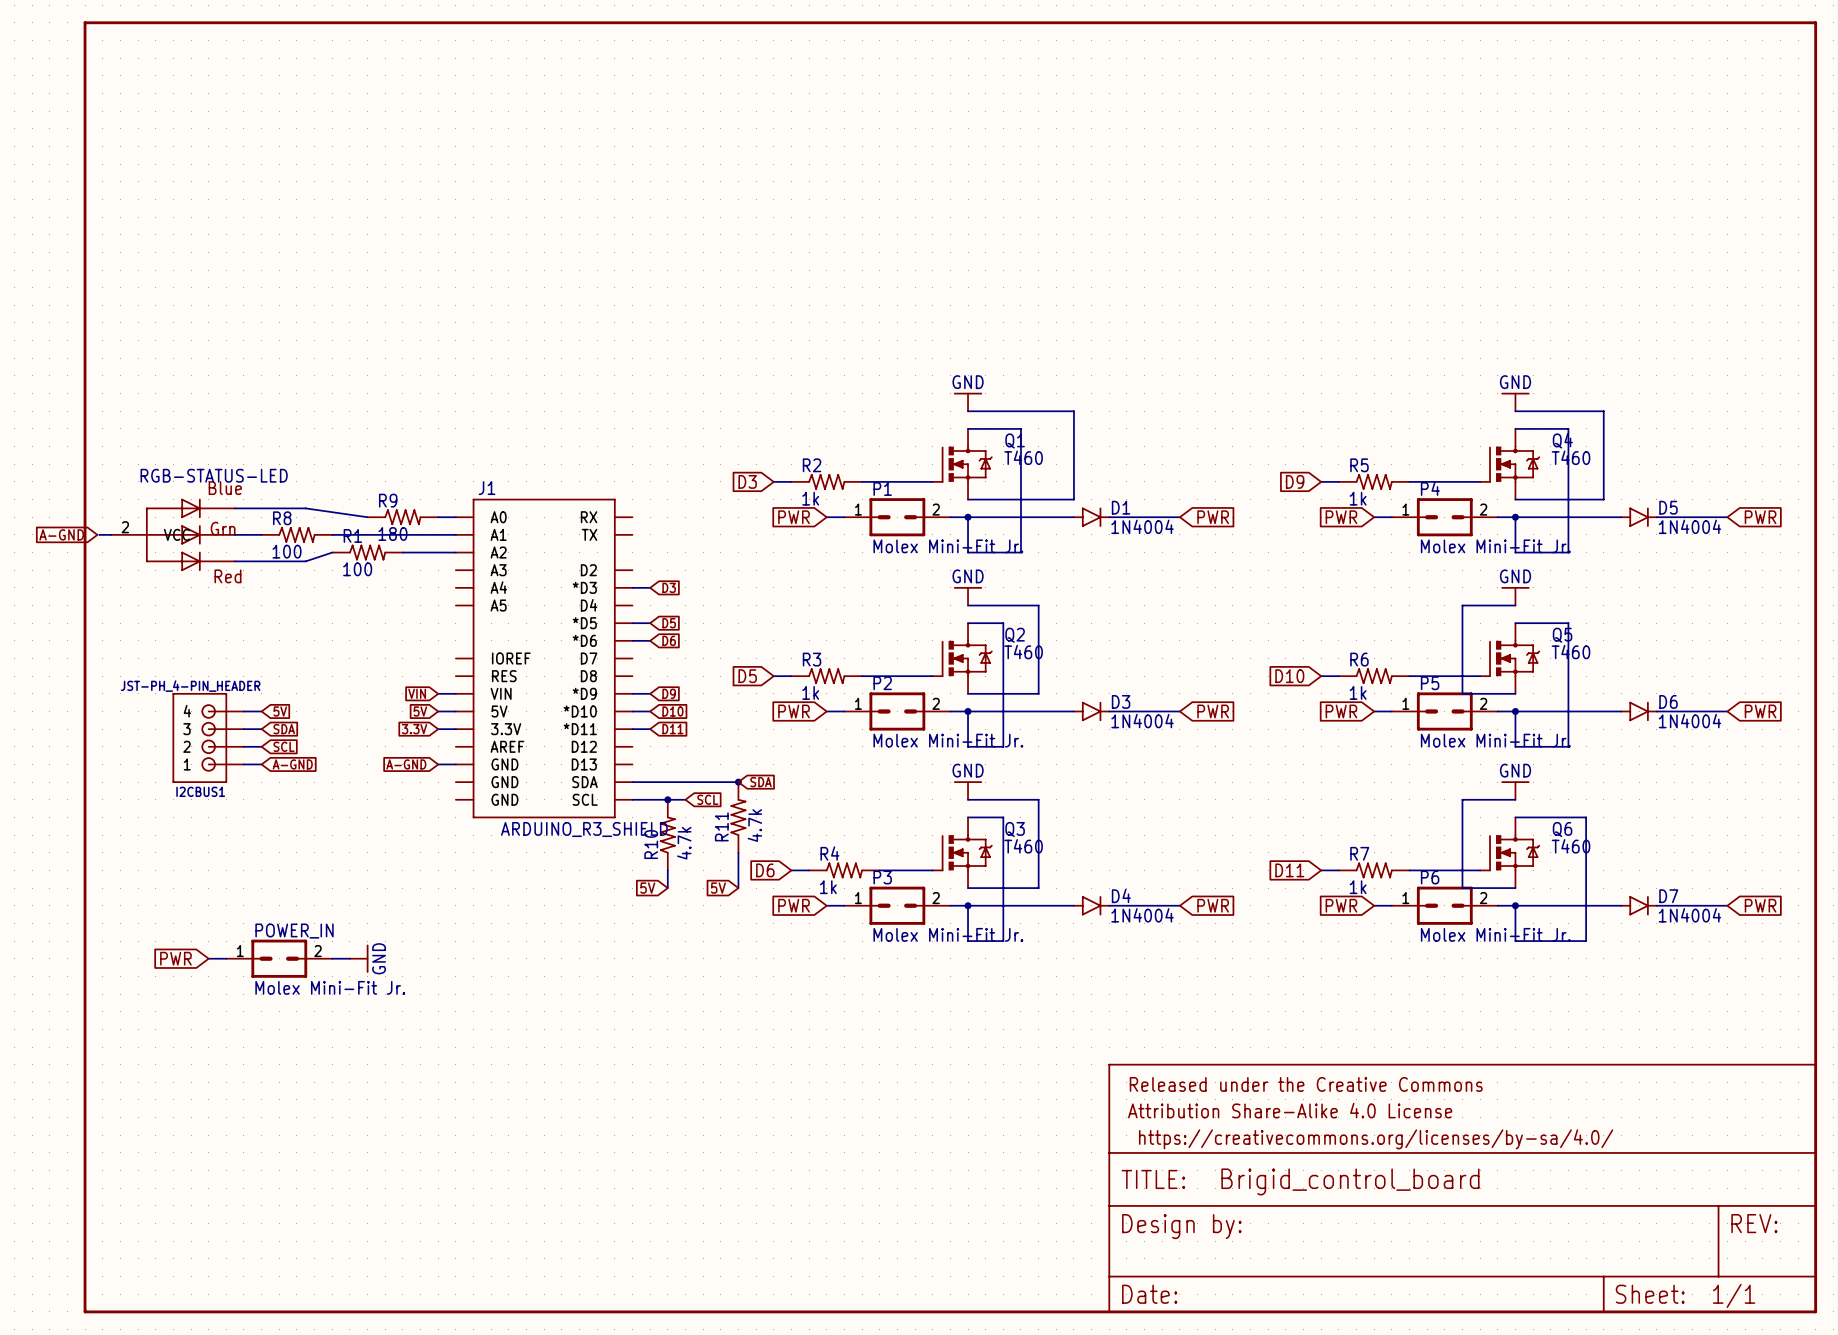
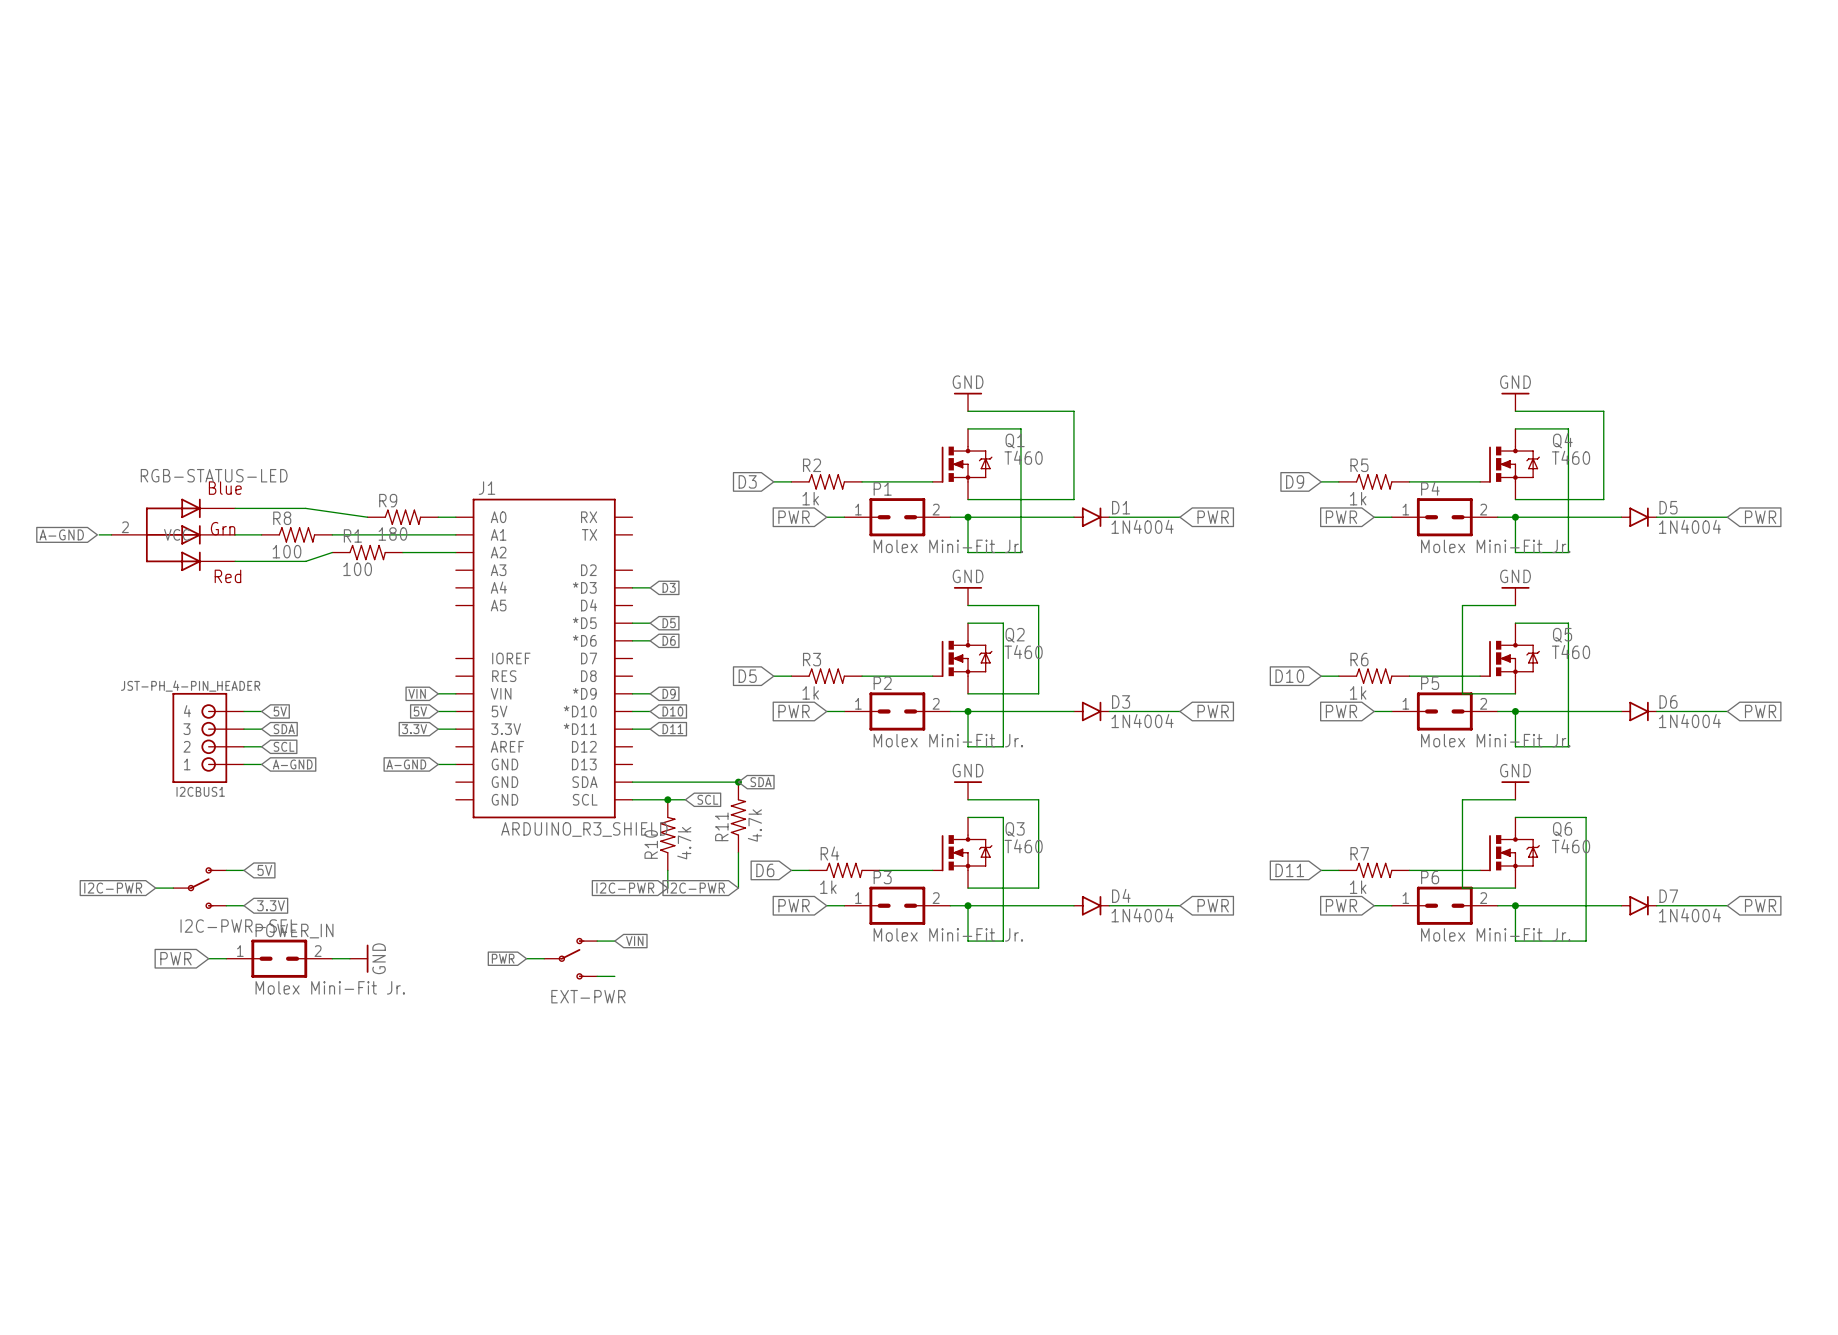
part: (950, 667) -> none
wire: none -> (226, 870) (243, 870)
global label: none -> 5V (264, 870)
global label: none -> I2C-PWR (113, 888)
wire: none -> (155, 888) (173, 888)
I2C-PWR-SEL: none -> (199, 888)
global label: 5V (647, 888) -> I2C-PWR (625, 888)
global label: 5V (718, 888) -> I2C-PWR (695, 888)
wire: none -> (226, 905) (243, 905)
global label: none -> 3.3V (270, 905)
wire: none -> (597, 941) (614, 941)
global label: none -> VIN (634, 941)
global label: none -> PWR (503, 958)
wire: none -> (526, 958) (544, 958)
EXT-PWR: none -> (570, 958)
wire: none -> (597, 976) (614, 976)
part: (1462, 1188) -> none

